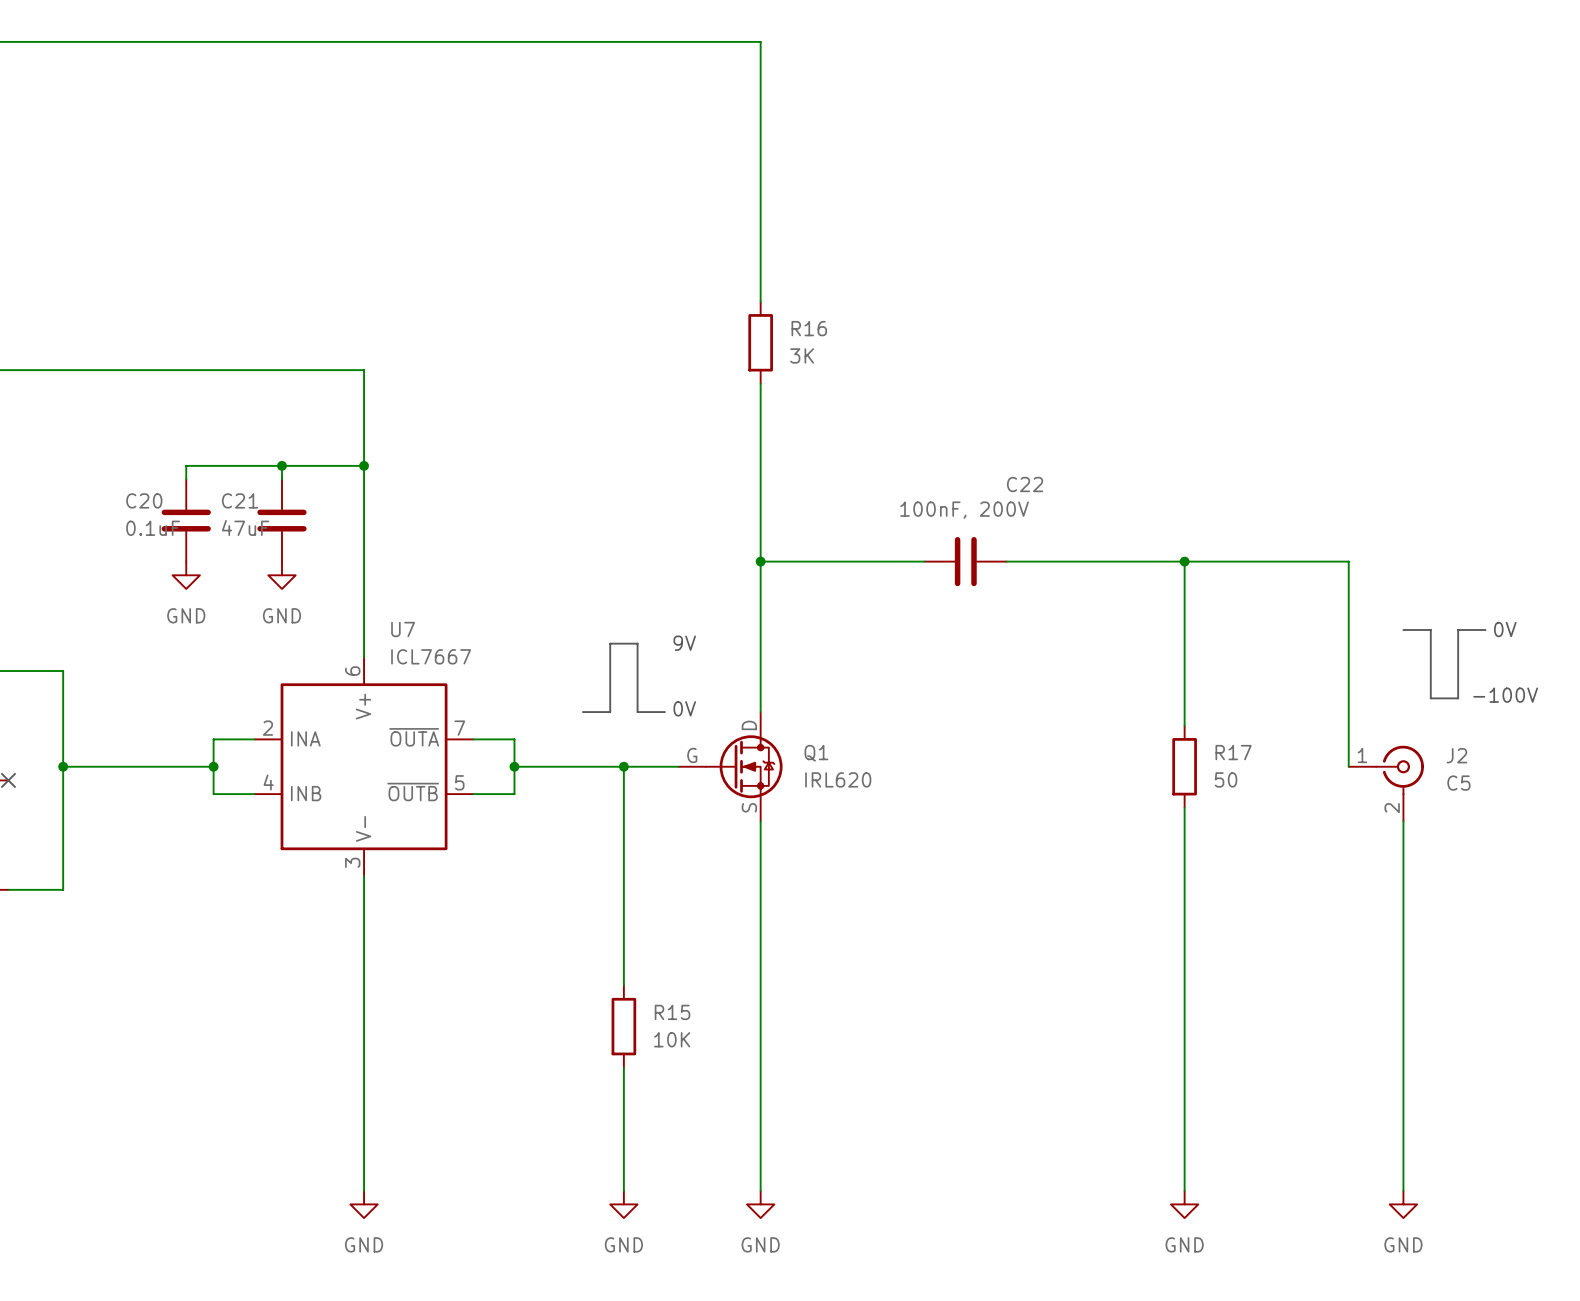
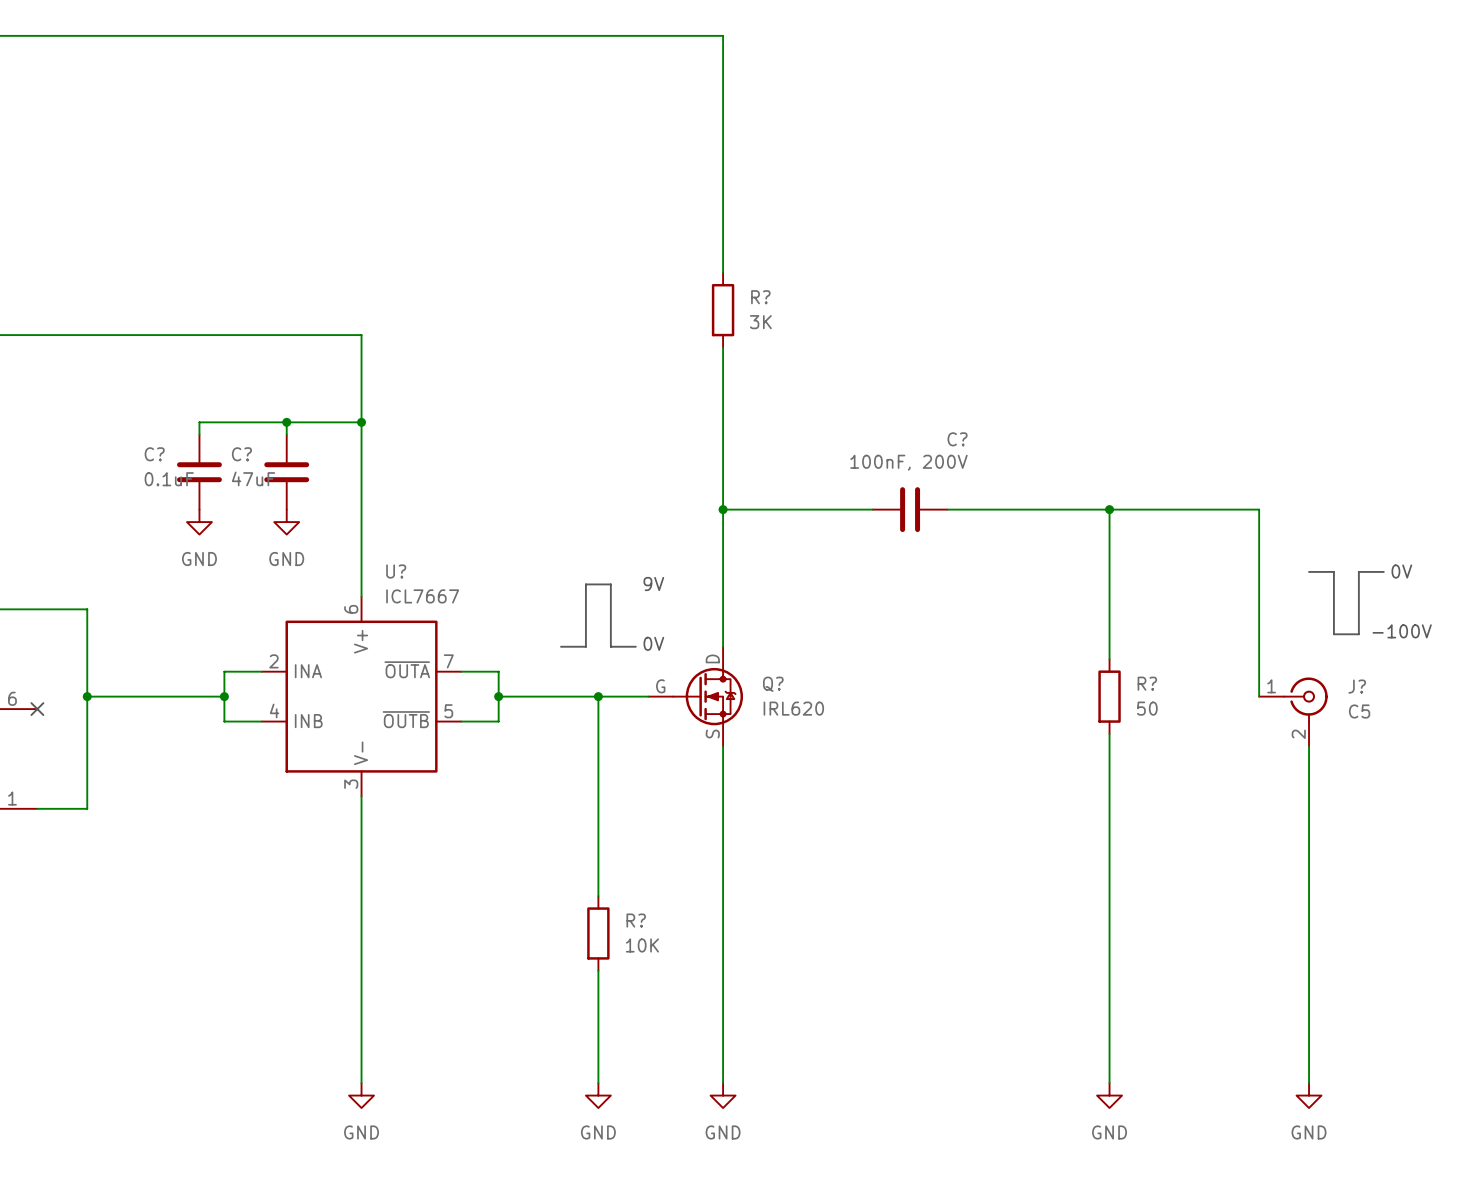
R16 name: R16 (809, 328) -> R? (760, 297)
C22 name: C22 (1025, 484) -> C? (957, 439)
C20 name: C20 (144, 500) -> C? (154, 454)
C21 name: C21 (240, 500) -> C? (241, 454)
U7 name: U7 (403, 629) -> U? (396, 571)
R17 name: R17 (1233, 752) -> R? (1147, 683)
Q1 name: Q1 (816, 753) -> Q? (773, 684)
J2 name: J2 (1456, 755) -> J? (1357, 686)
R15 name: R15 (672, 1012) -> R? (636, 920)

